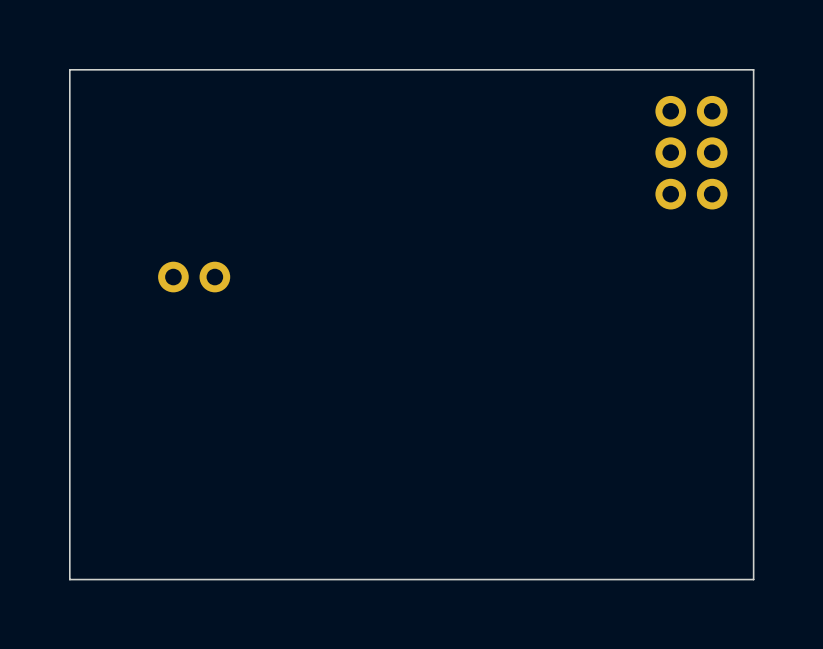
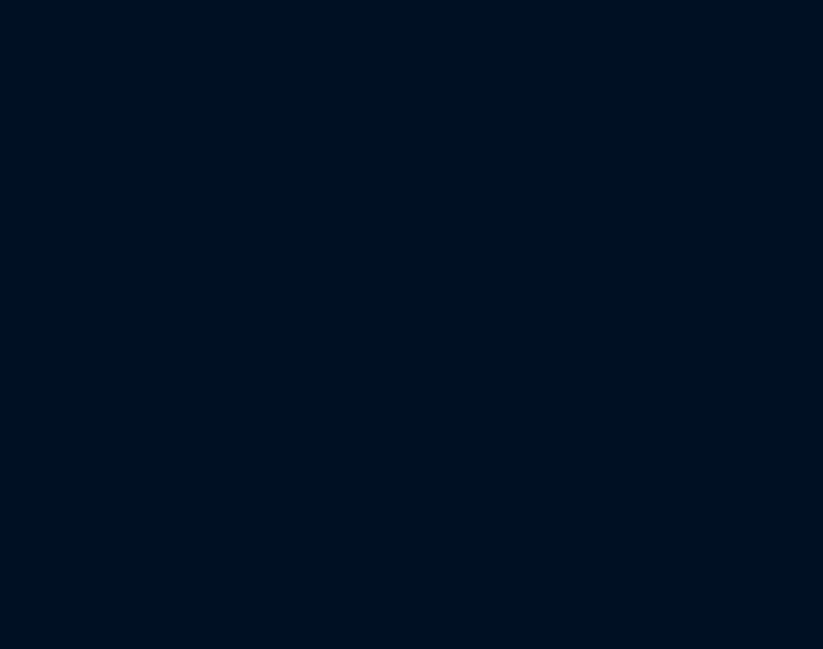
board edge: (753, 69) (69, 69) (69, 579) (753, 579) (753, 69) -> none
part: (691, 152) -> none
part: (194, 277) -> none

